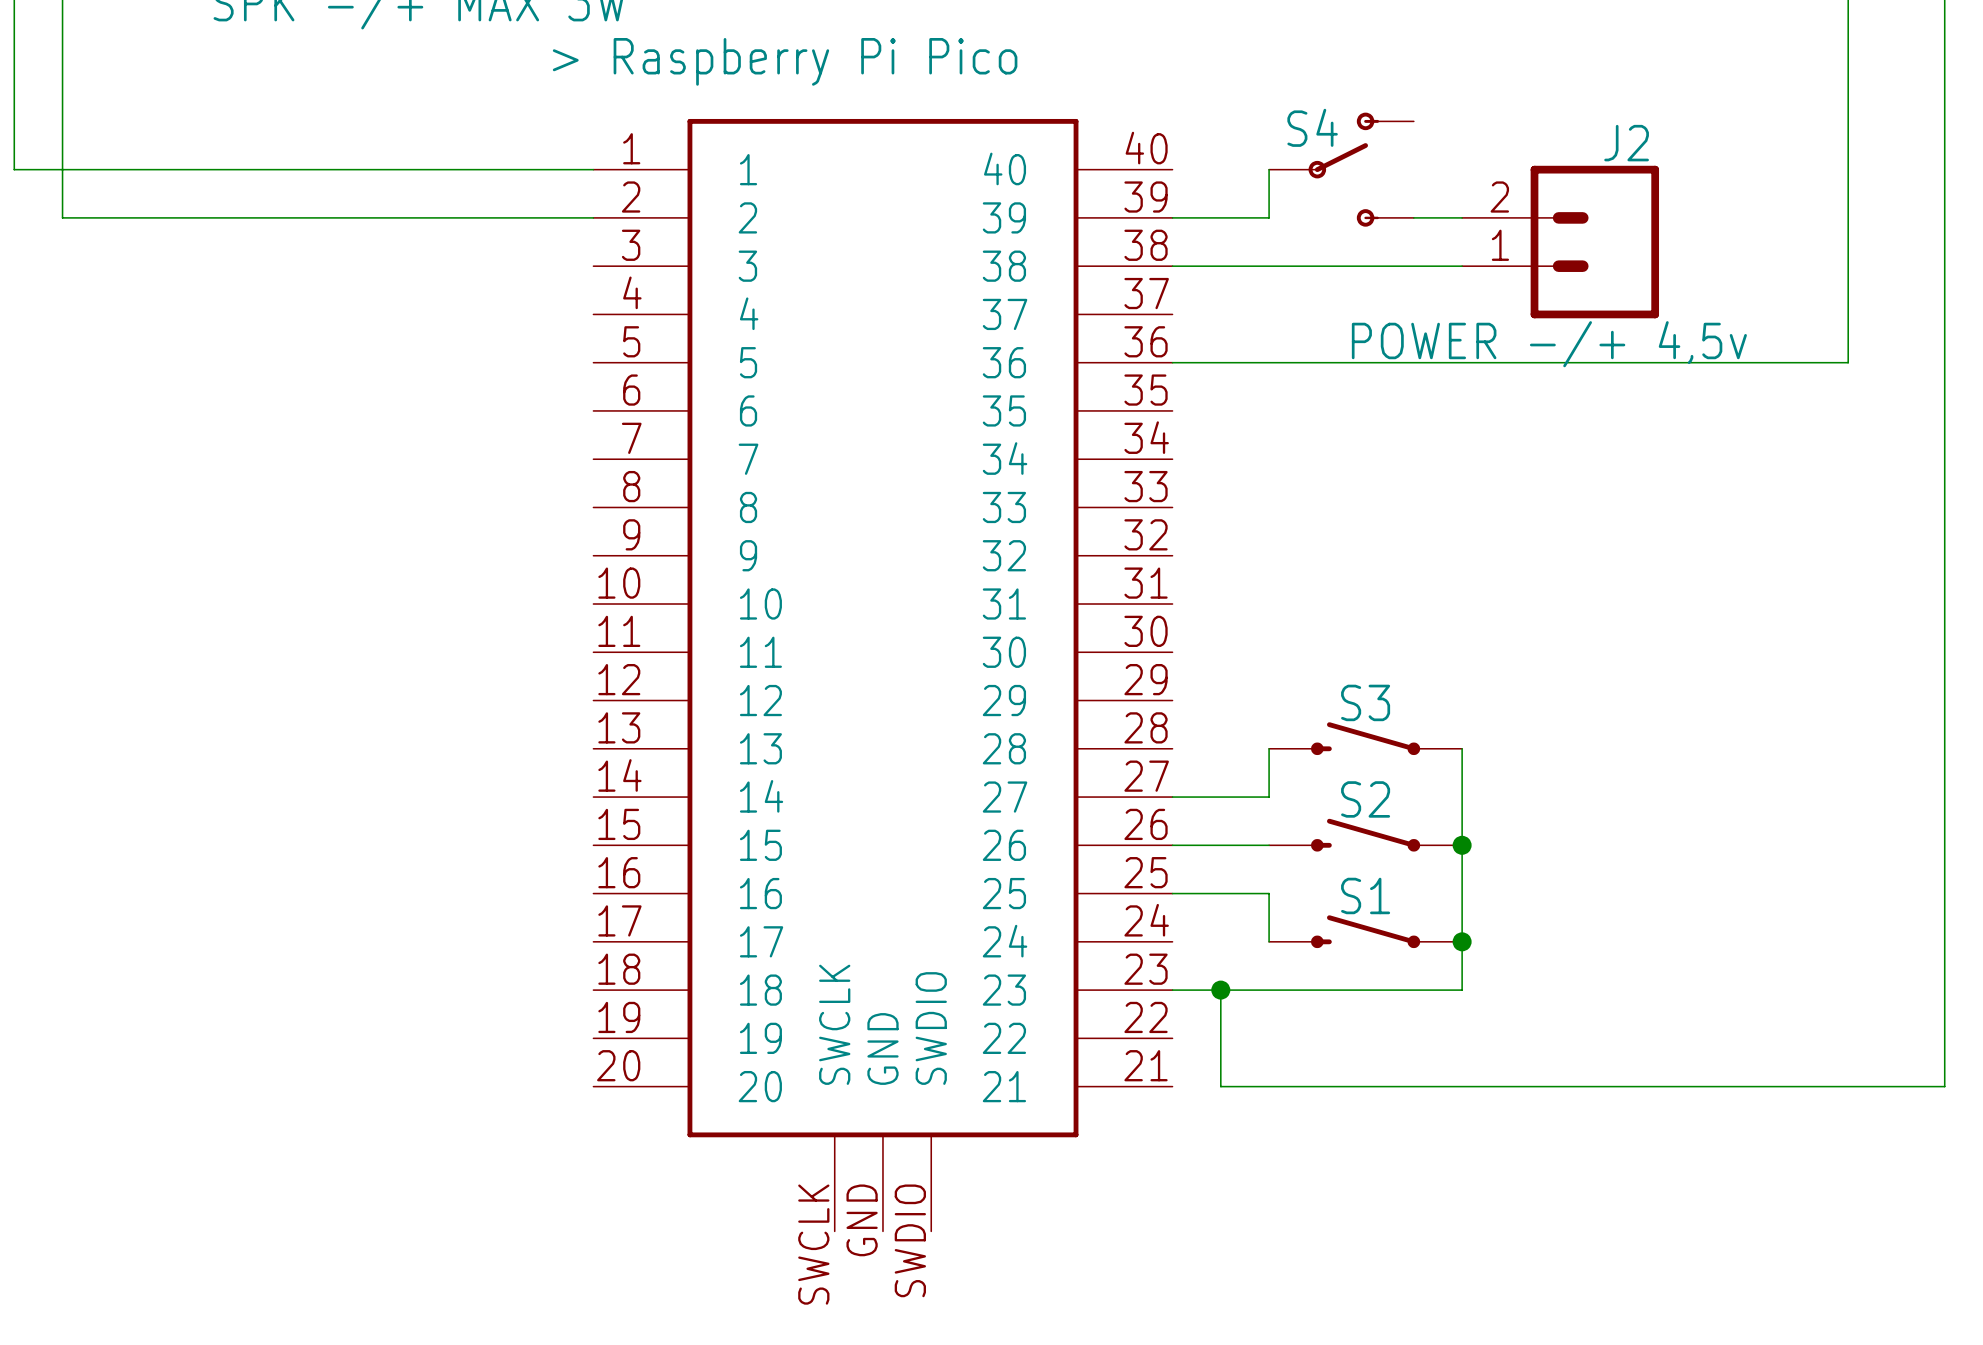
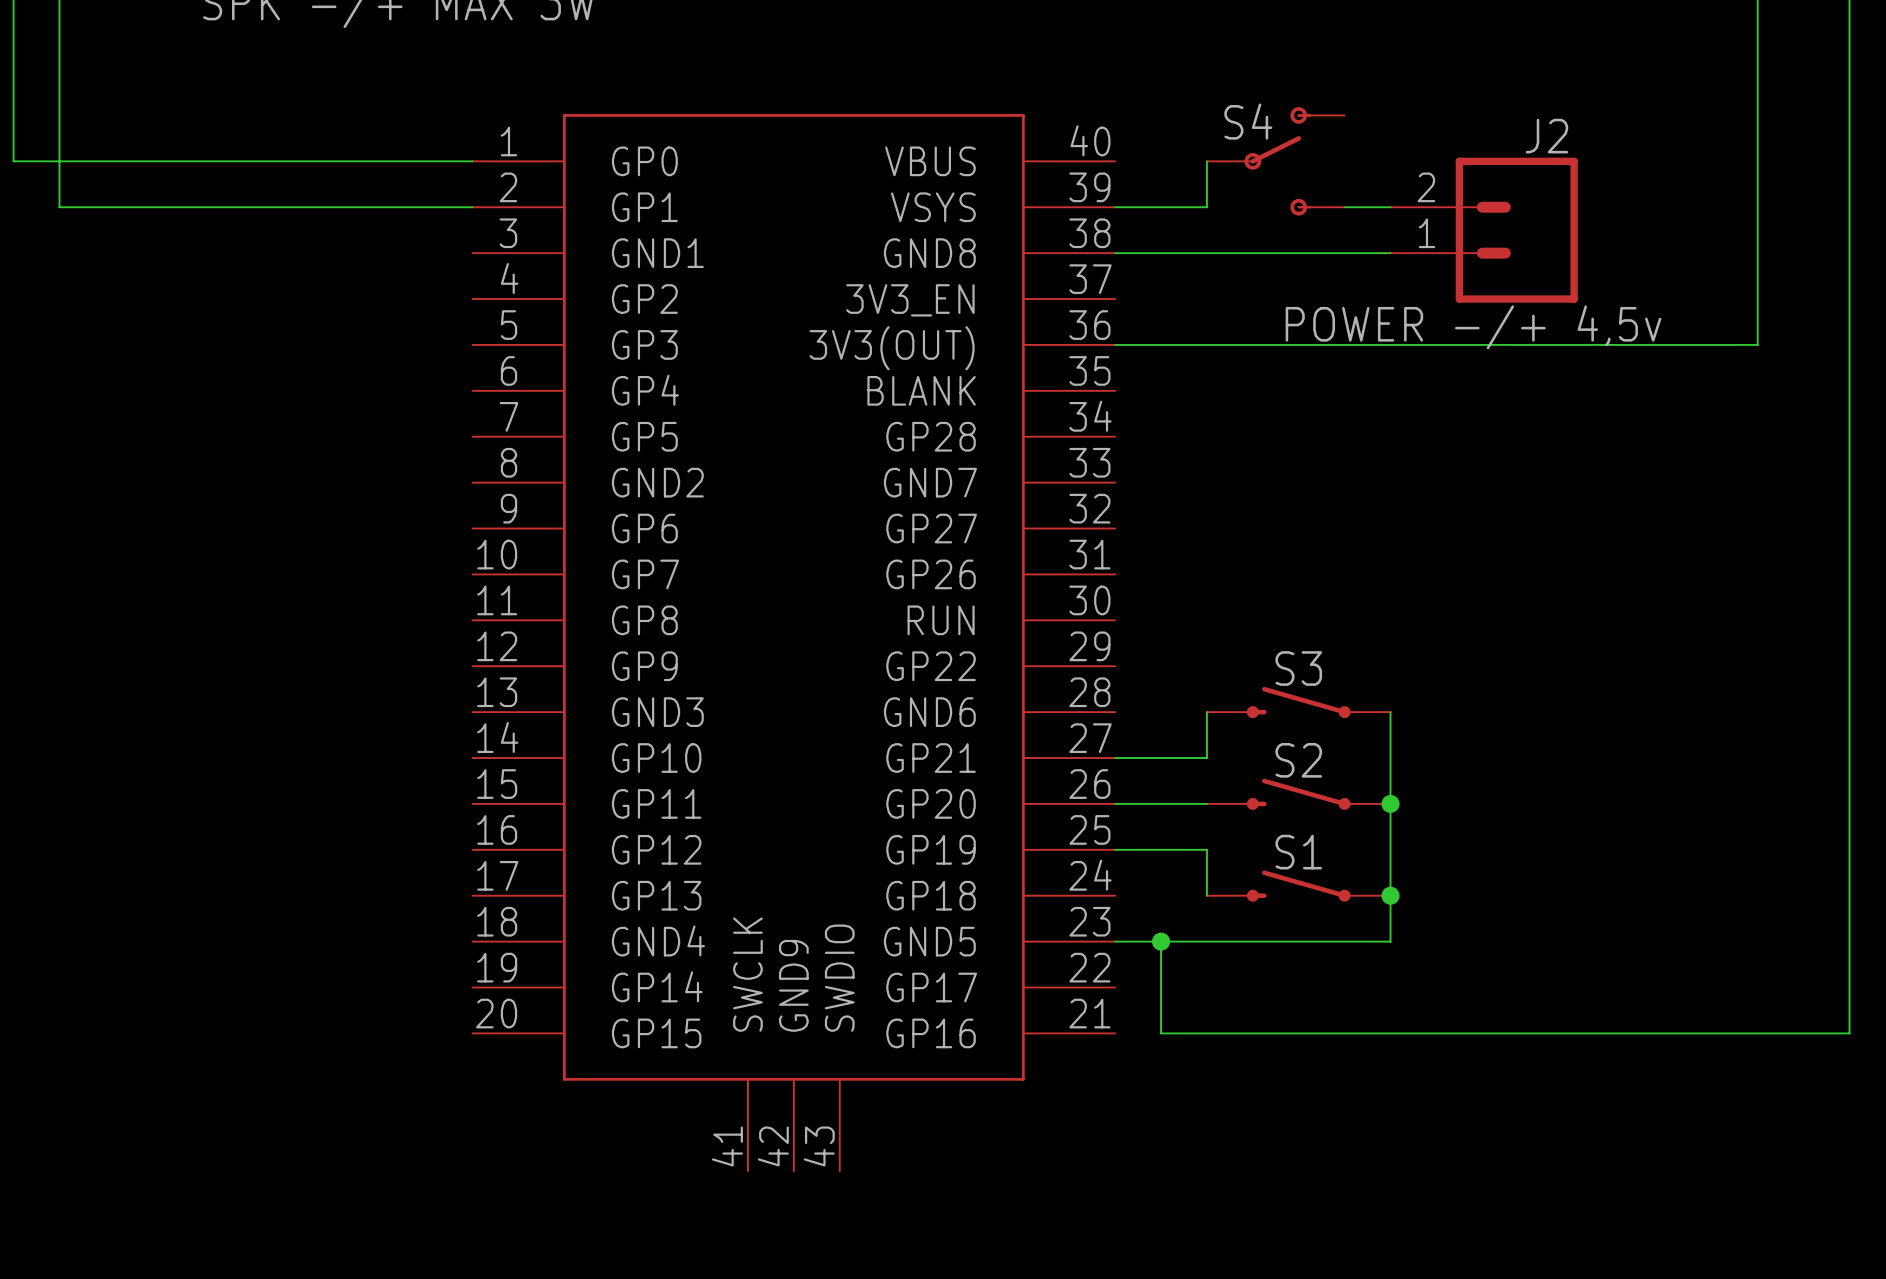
part: none -> (793, 642)
part: (882, 675) -> none

